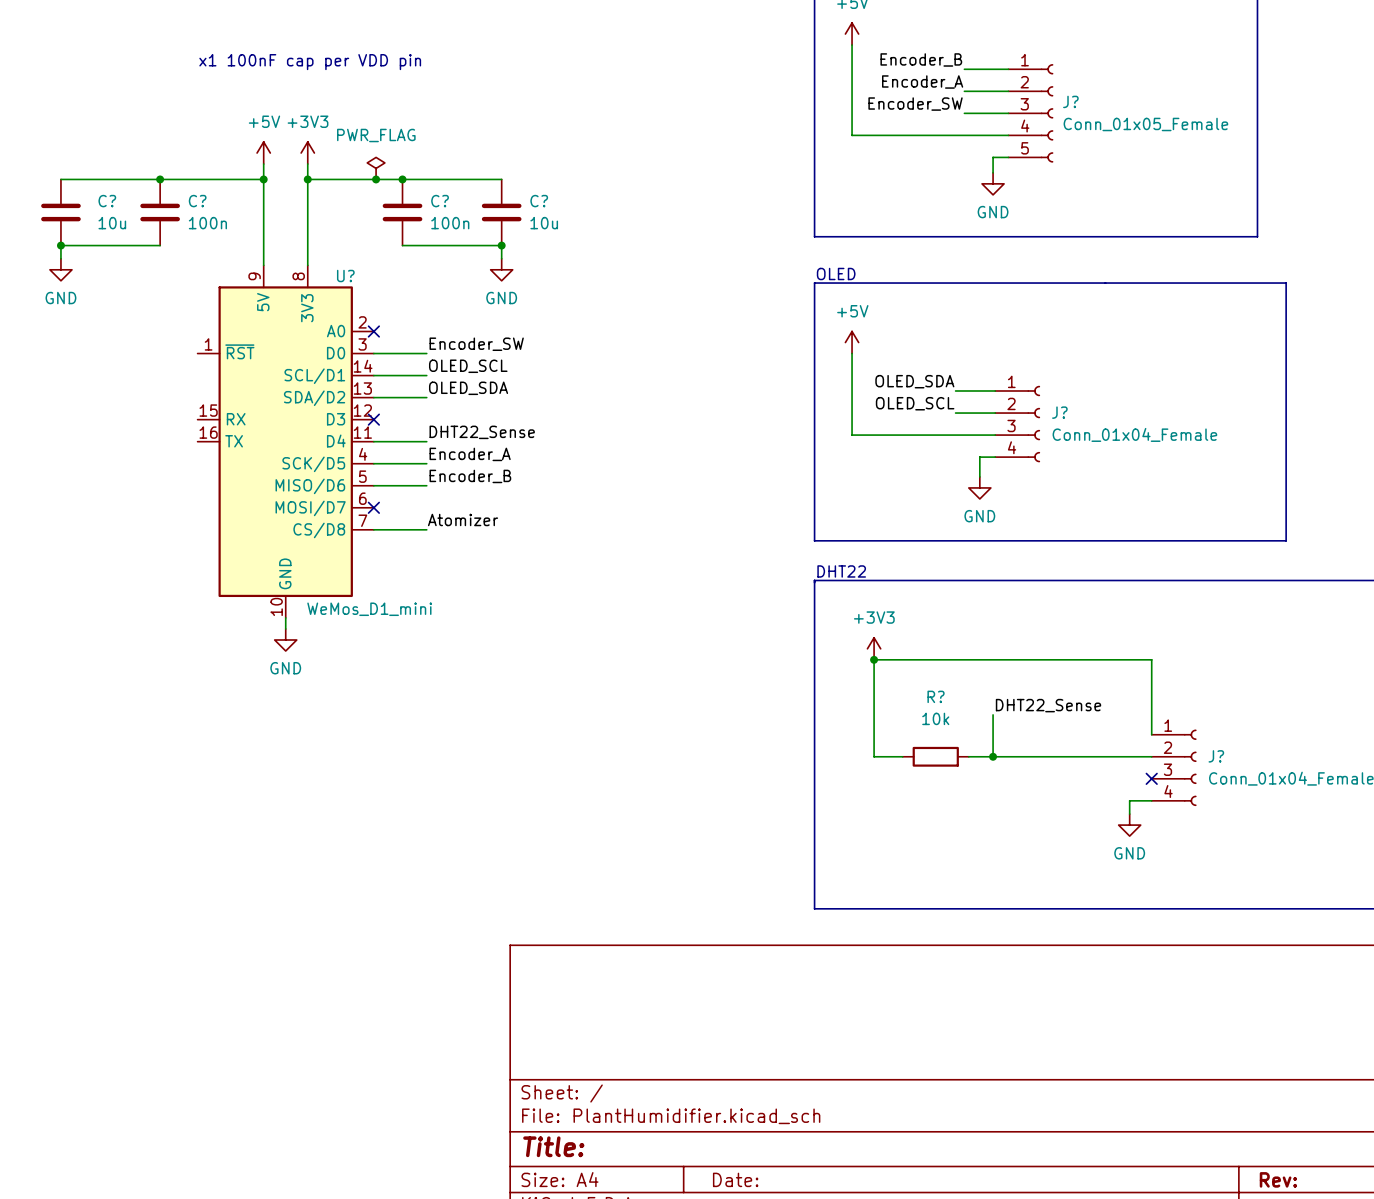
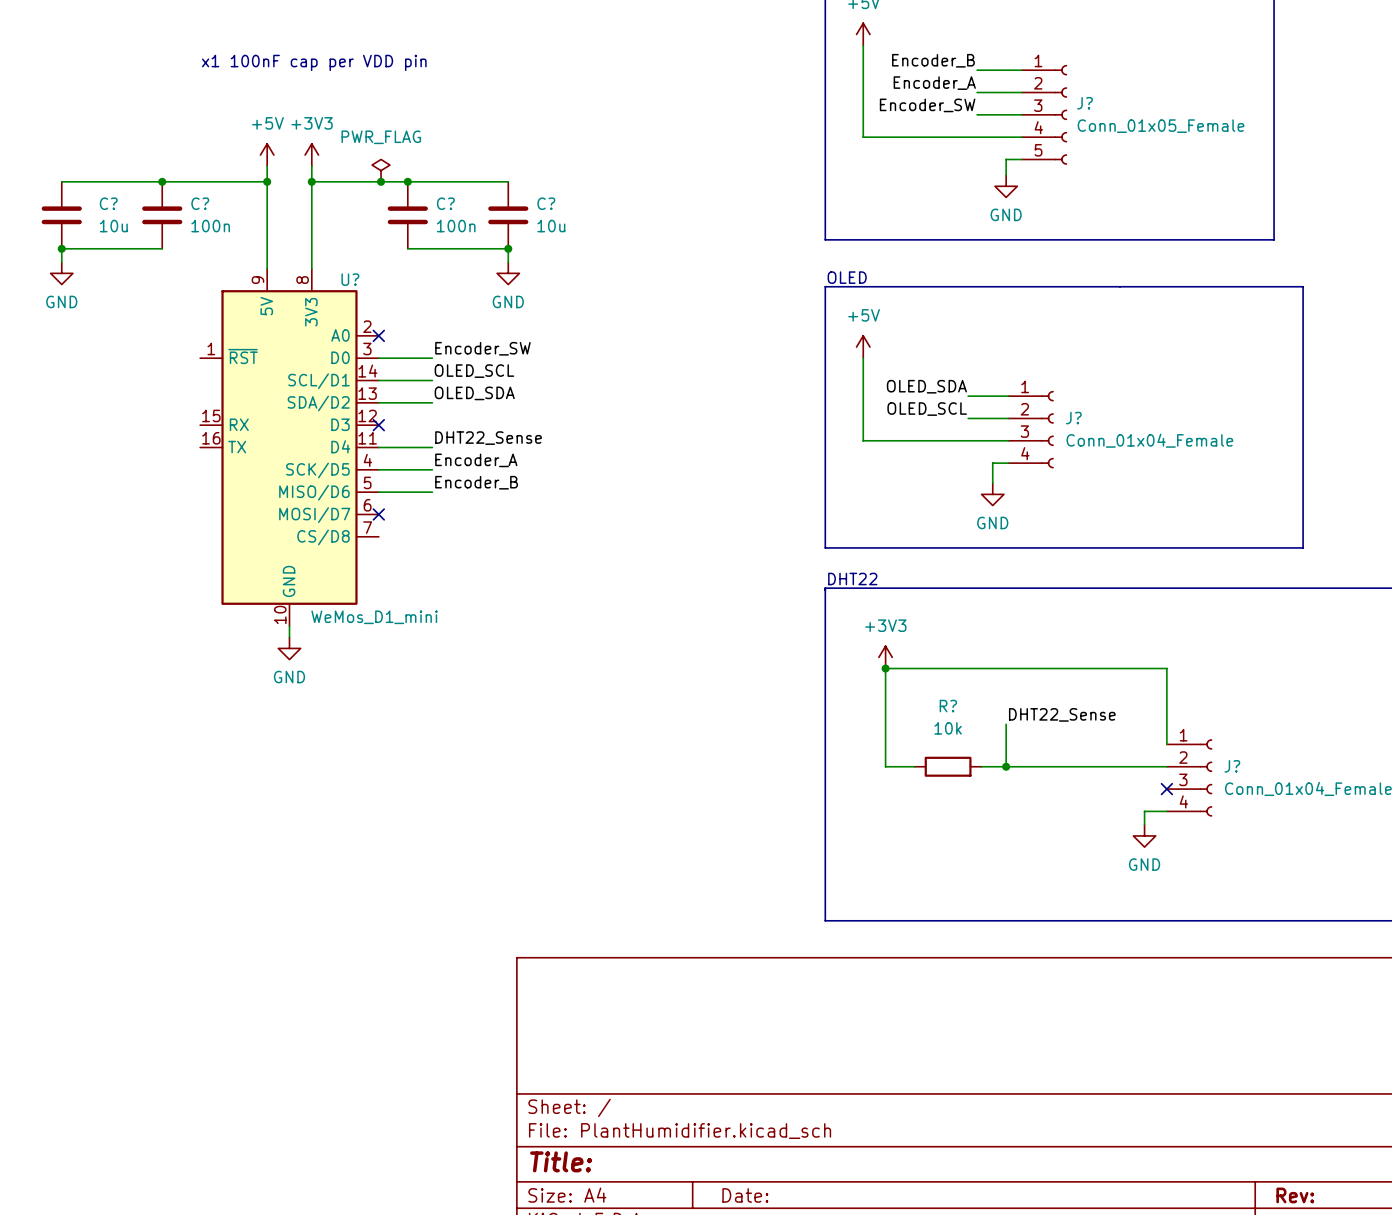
label: Atomizer (463, 519) -> none
wire: (373, 529) (426, 529) -> none

